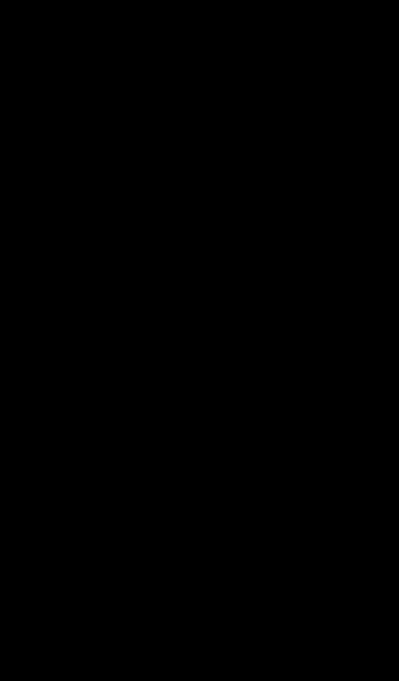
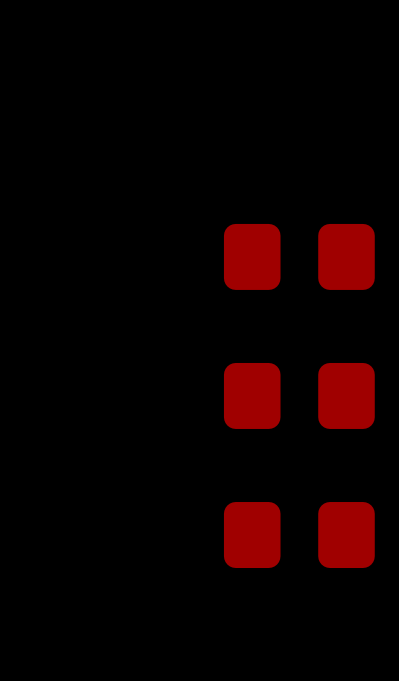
part: none -> (299, 256)
part: none -> (299, 395)
part: none -> (299, 535)

